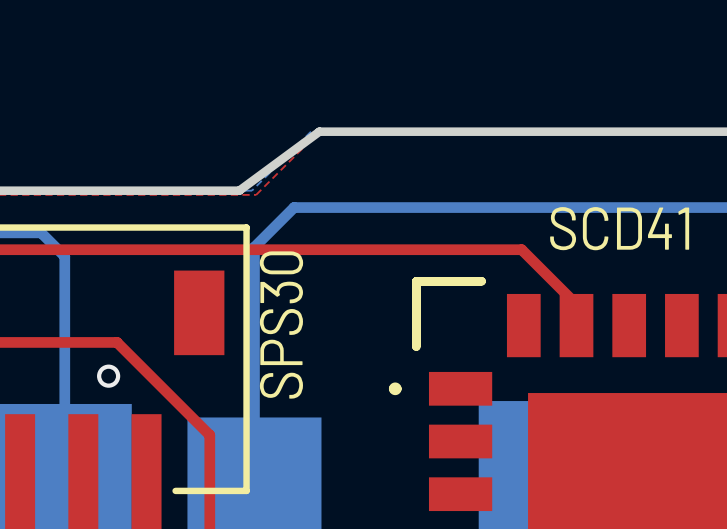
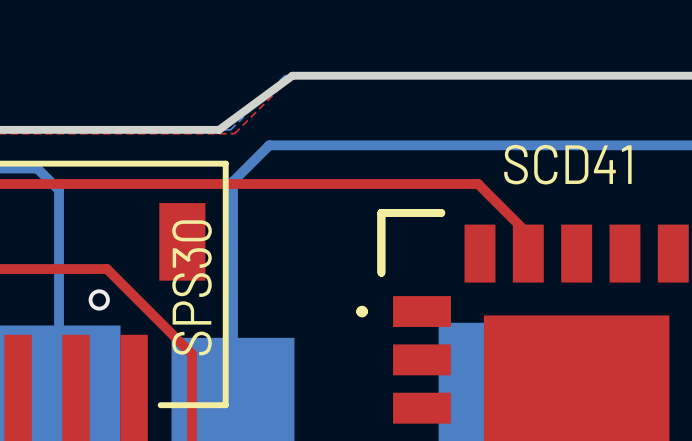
text position: SPS30 (281, 325) -> SPS30 (192, 287)

